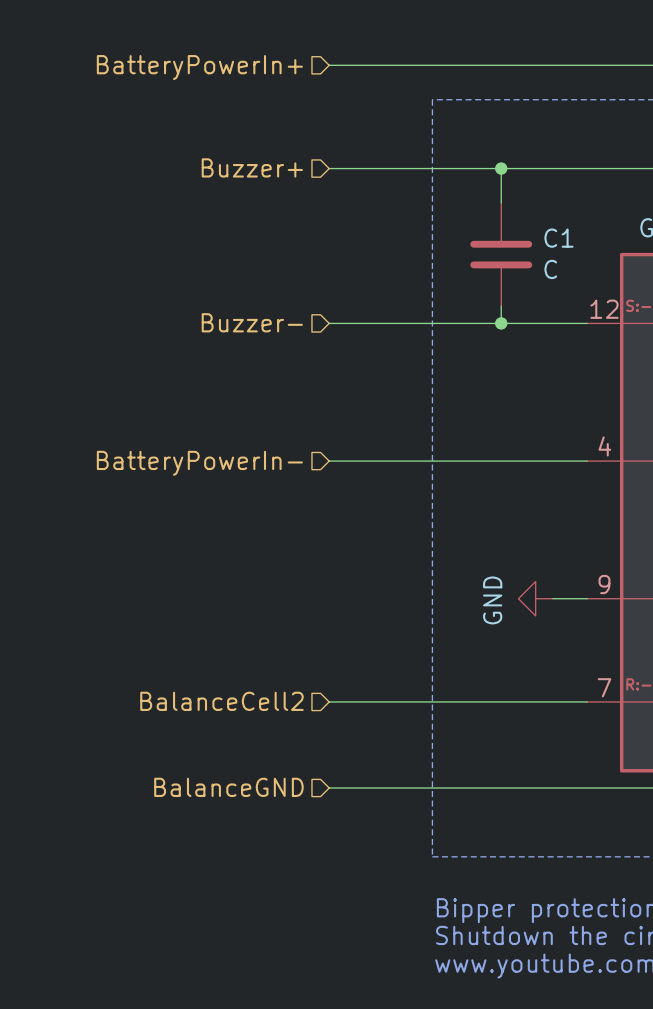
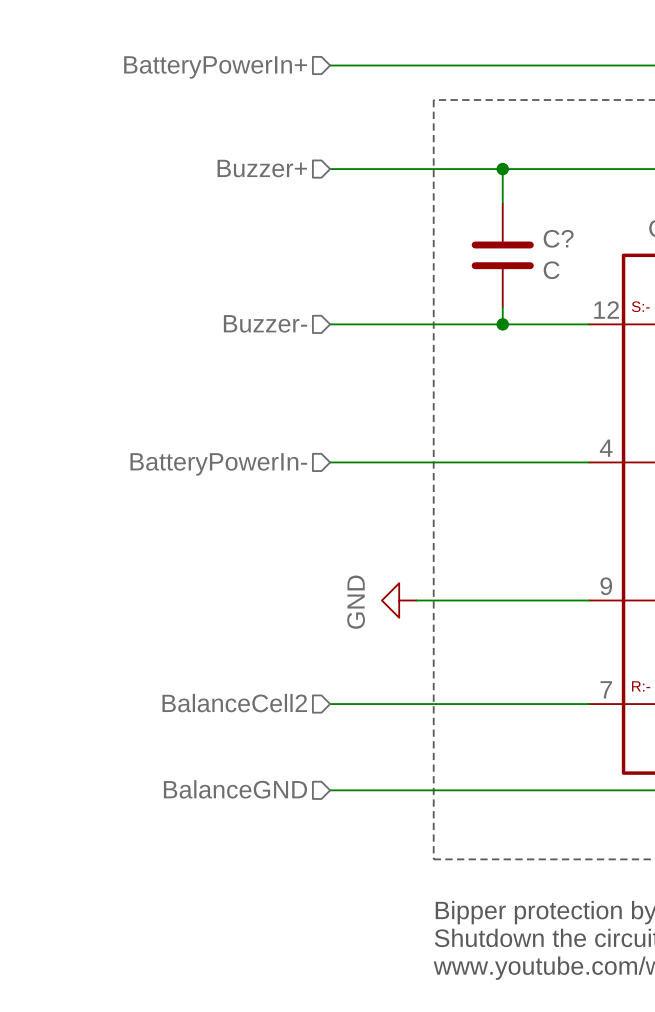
C1 name: C1 (558, 238) -> C? (558, 238)
wire: none -> (416, 600) (554, 600)
power symbol position: GND (535, 598) -> GND (399, 600)

